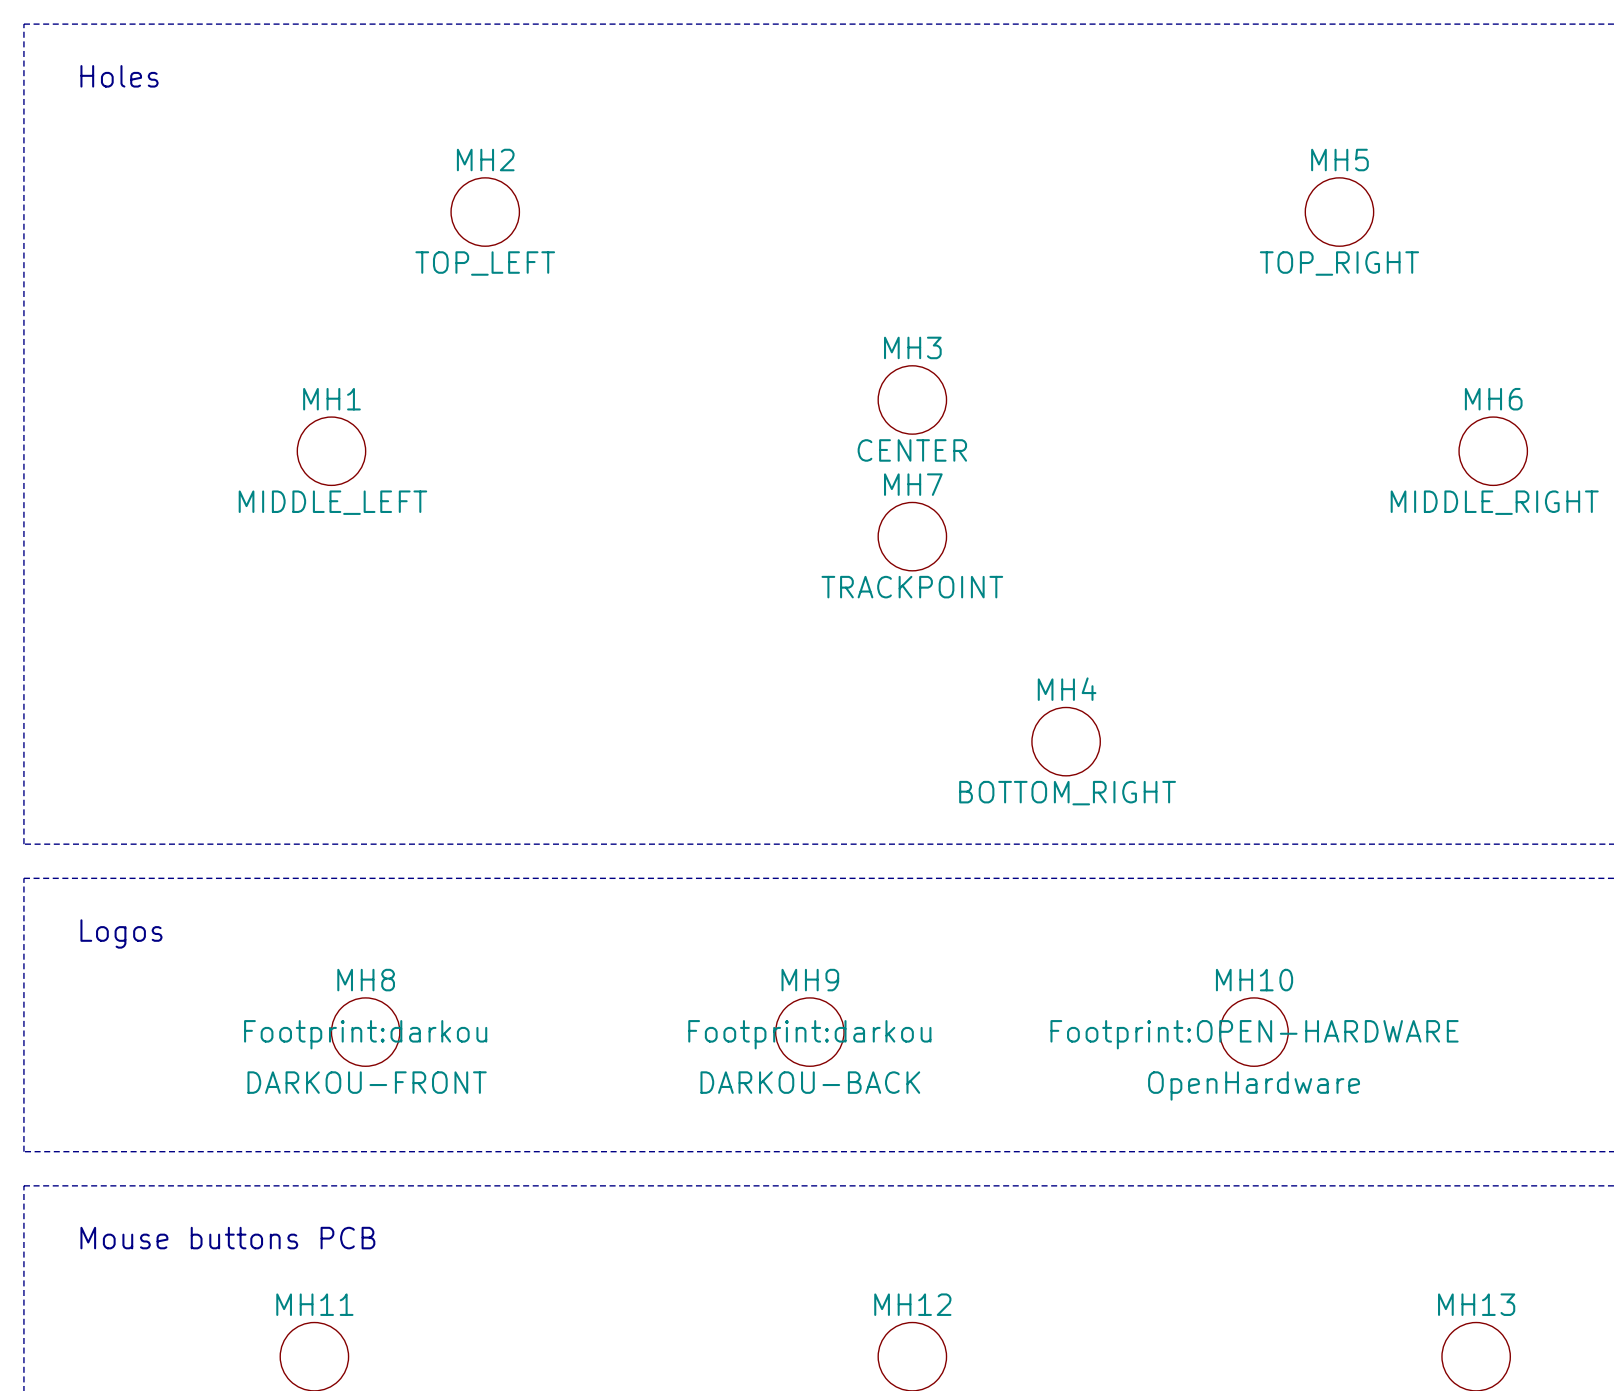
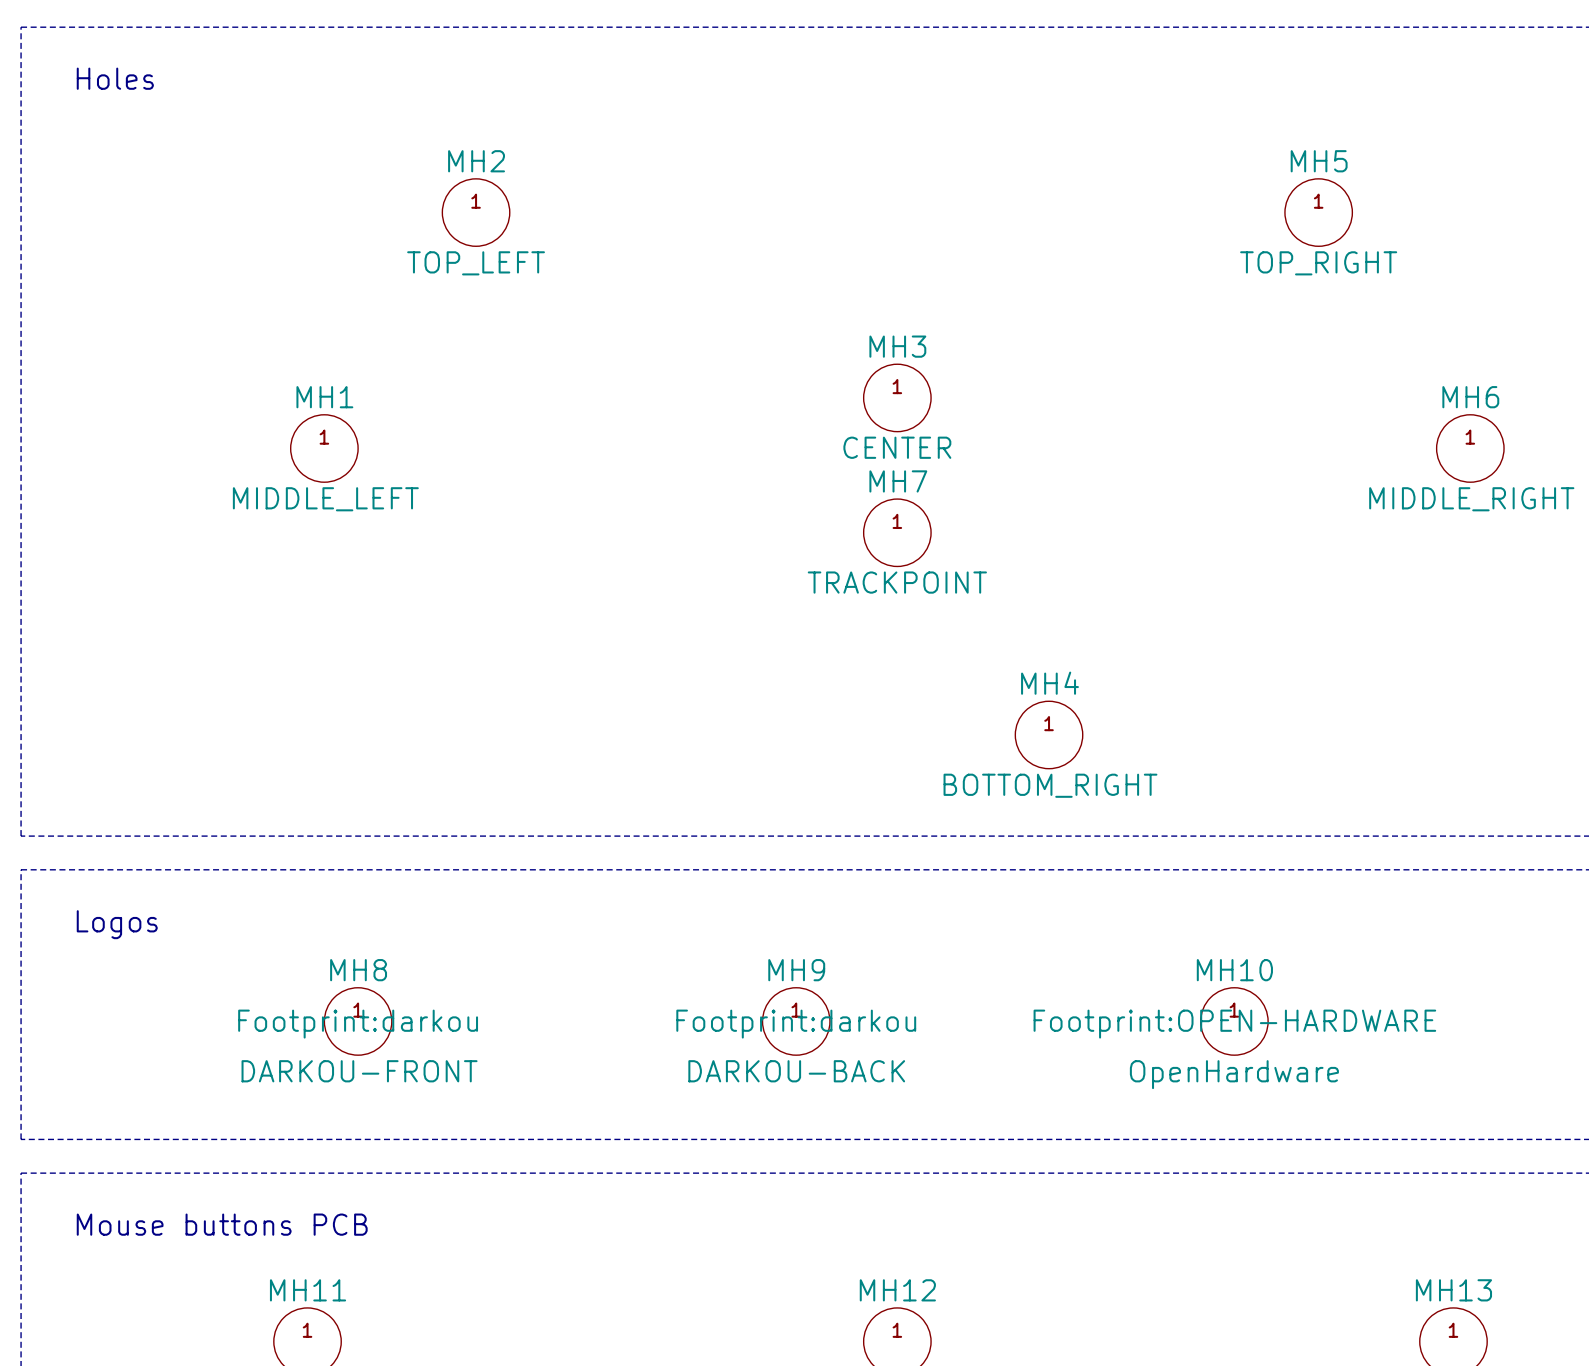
MH2 pin number: none -> 1 (476, 201)
MH5 pin number: none -> 1 (1318, 201)
MH3 pin number: none -> 1 (897, 386)
MH1 pin number: none -> 1 (324, 437)
MH6 pin number: none -> 1 (1470, 437)
MH7 pin number: none -> 1 (897, 521)
MH4 pin number: none -> 1 (1049, 723)
MH8 pin number: none -> 1 (358, 1010)
MH9 pin number: none -> 1 (796, 1010)
MH10 pin number: none -> 1 (1234, 1010)
MH11 pin number: none -> 1 (307, 1330)
MH12 pin number: none -> 1 (897, 1330)
MH13 pin number: none -> 1 (1453, 1330)

